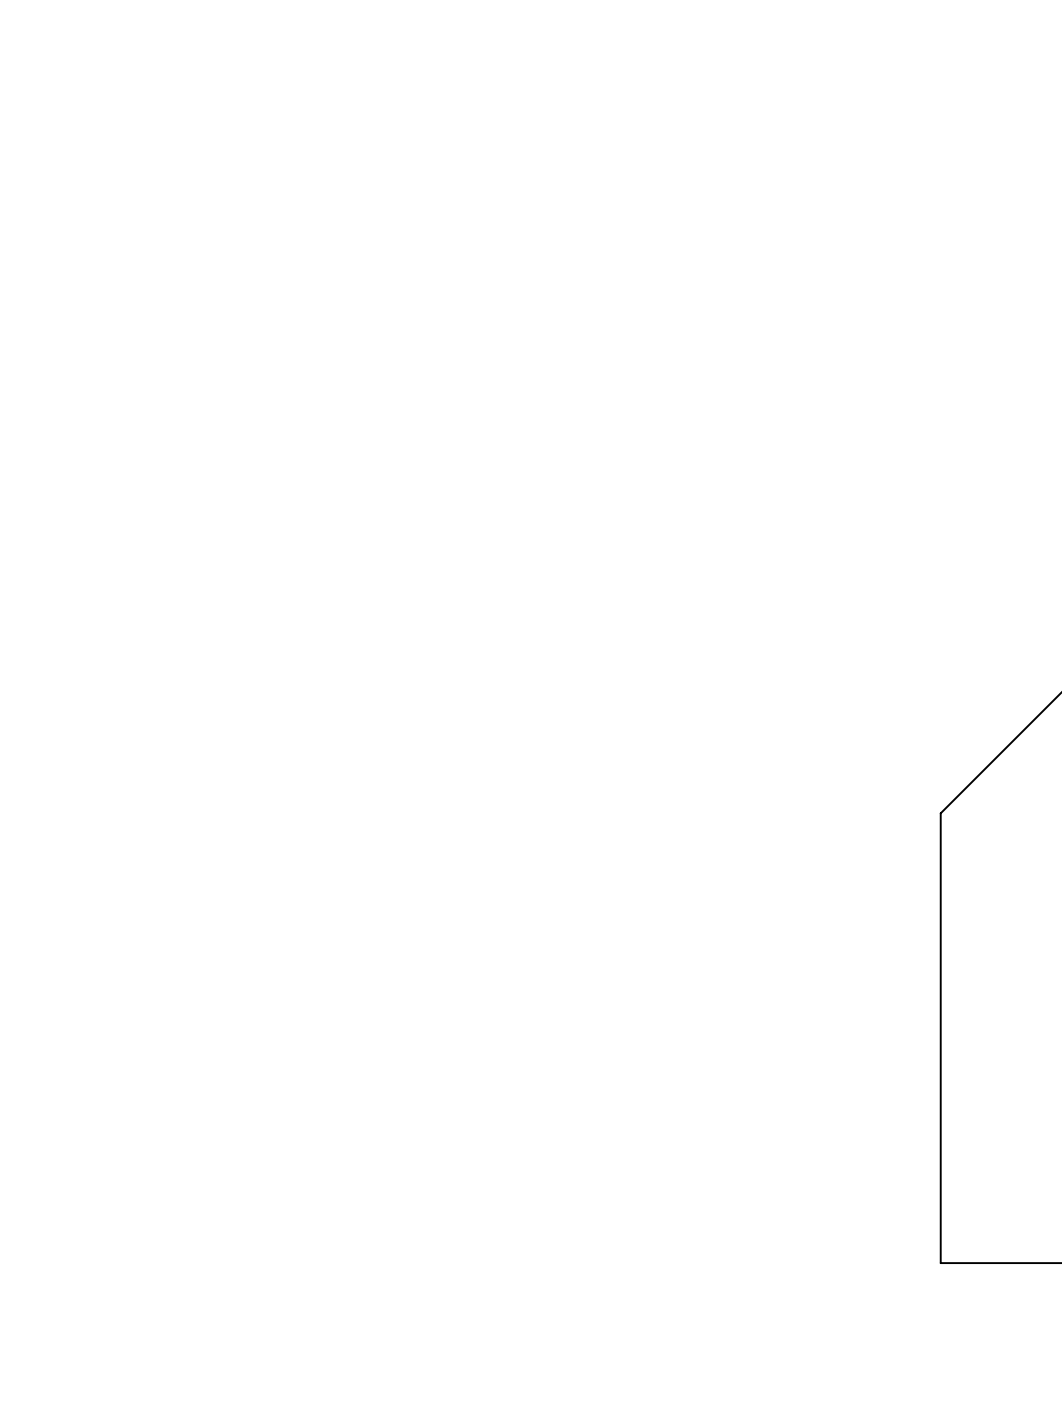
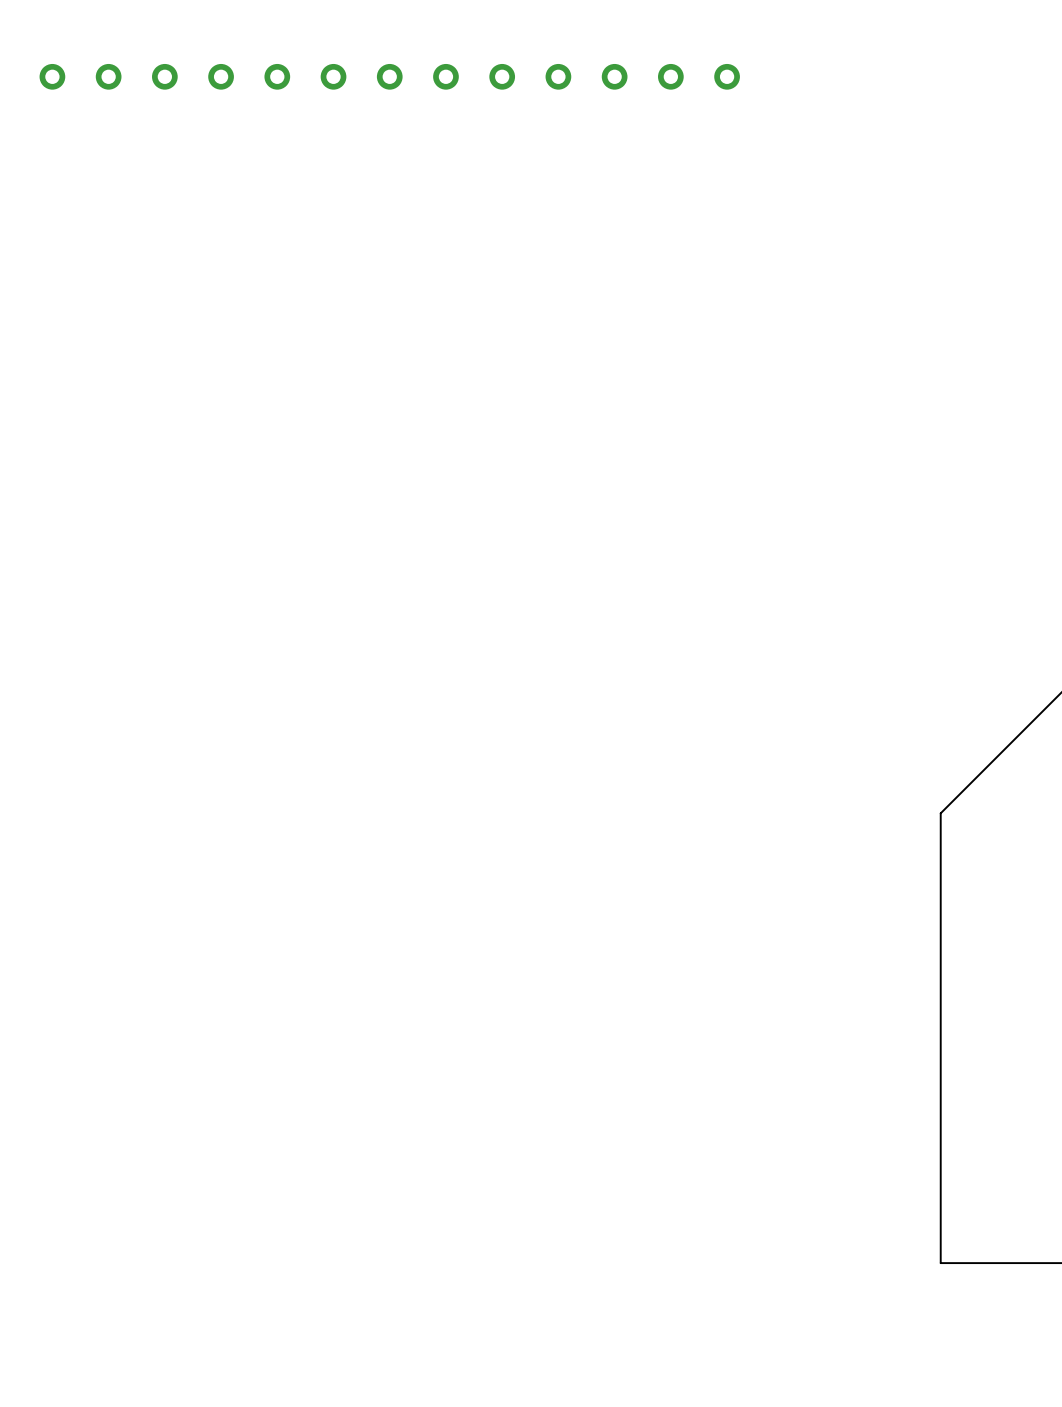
via: none -> (52, 76)
via: none -> (108, 76)
via: none -> (164, 76)
via: none -> (221, 76)
via: none -> (277, 76)
via: none -> (333, 76)
via: none -> (389, 76)
via: none -> (445, 76)
via: none -> (502, 76)
via: none -> (558, 76)
via: none -> (614, 76)
via: none -> (670, 76)
via: none -> (727, 76)

